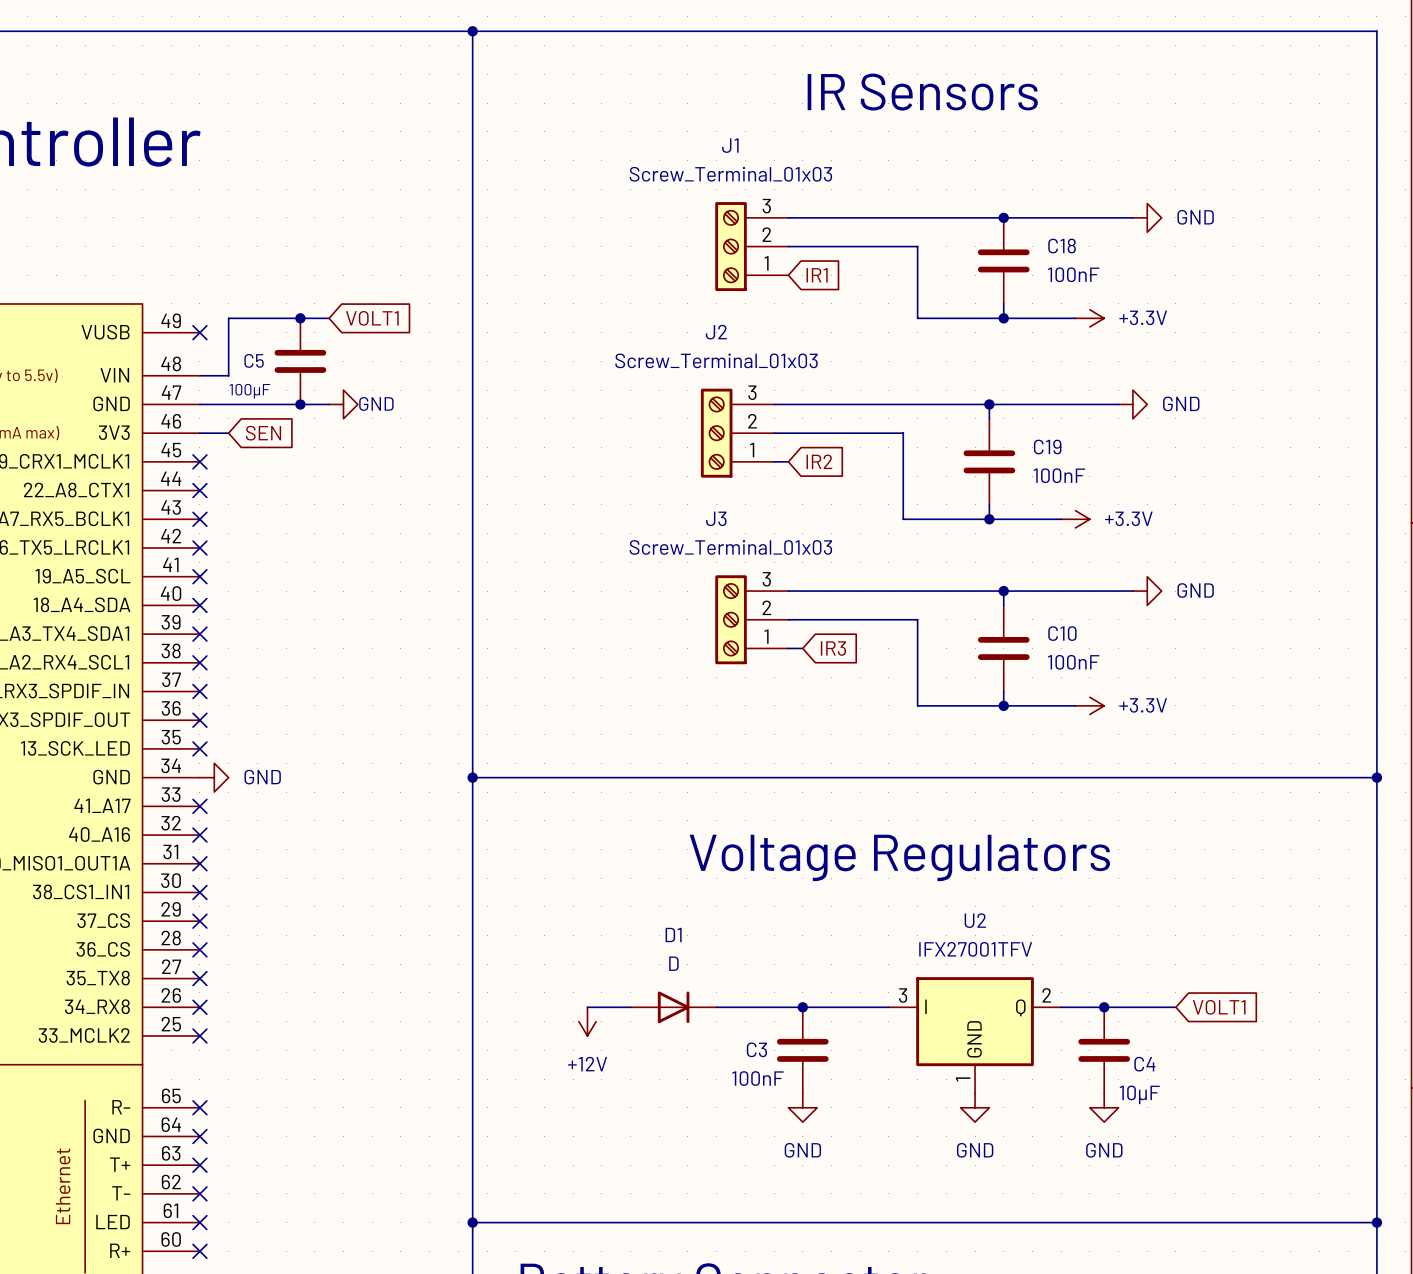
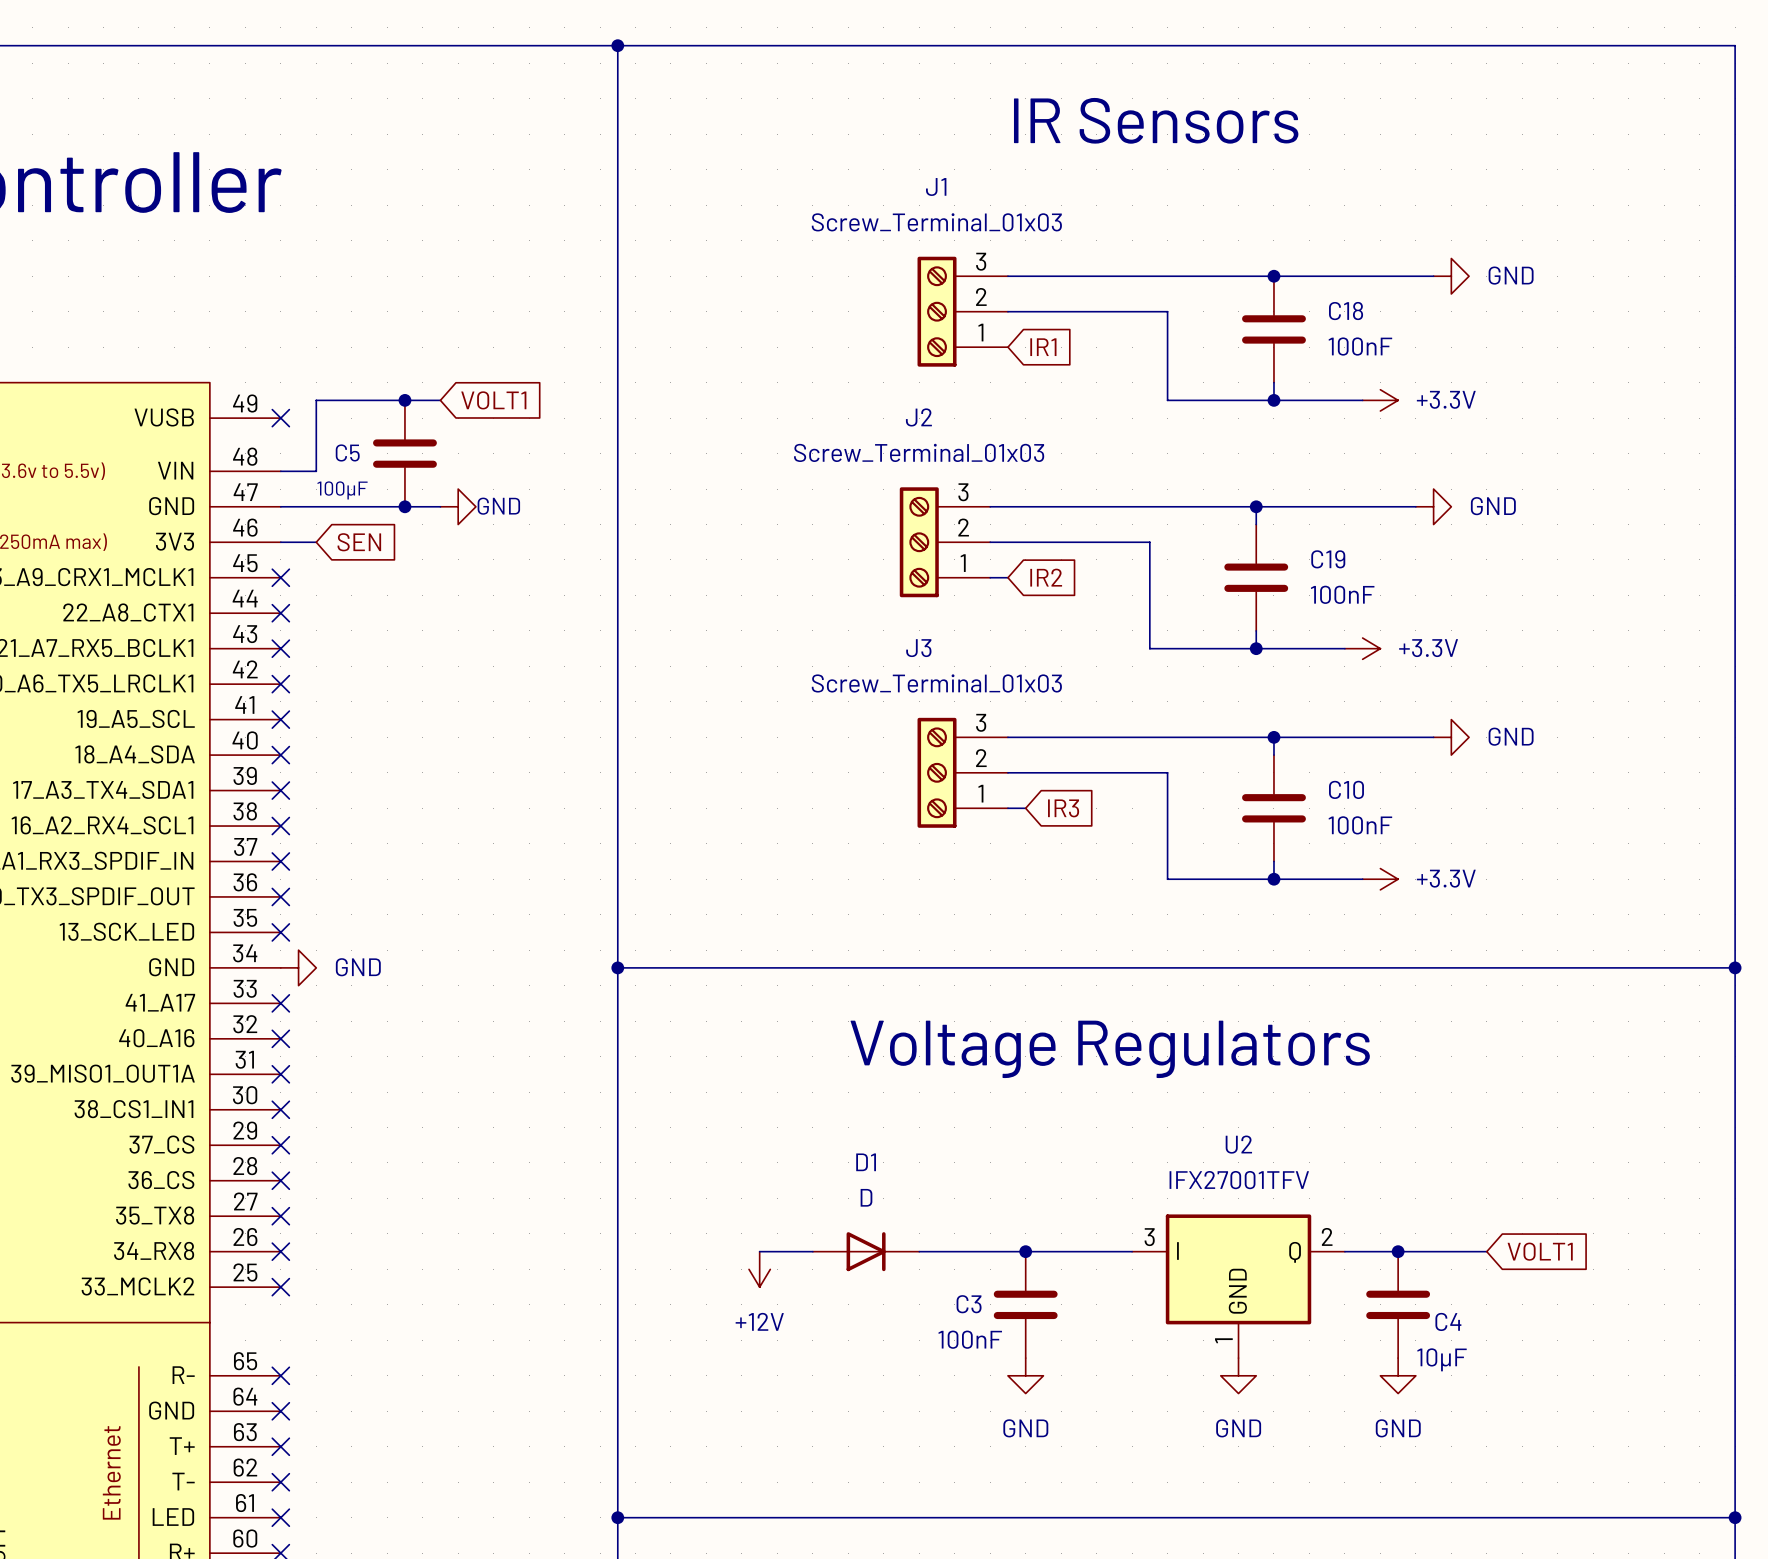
text position: IR Sensors (922, 92) -> IR Sensors (1156, 120)
text position: Voltage Regulators (899, 857) -> Voltage Regulators (1110, 1049)

